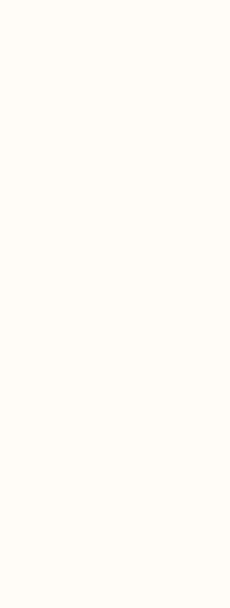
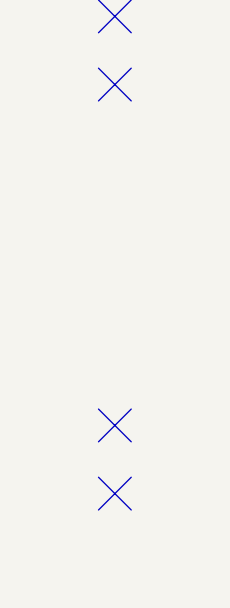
no-connect mark: none -> (114, 16)
no-connect mark: none -> (114, 84)
no-connect mark: none -> (114, 425)
no-connect mark: none -> (114, 493)

